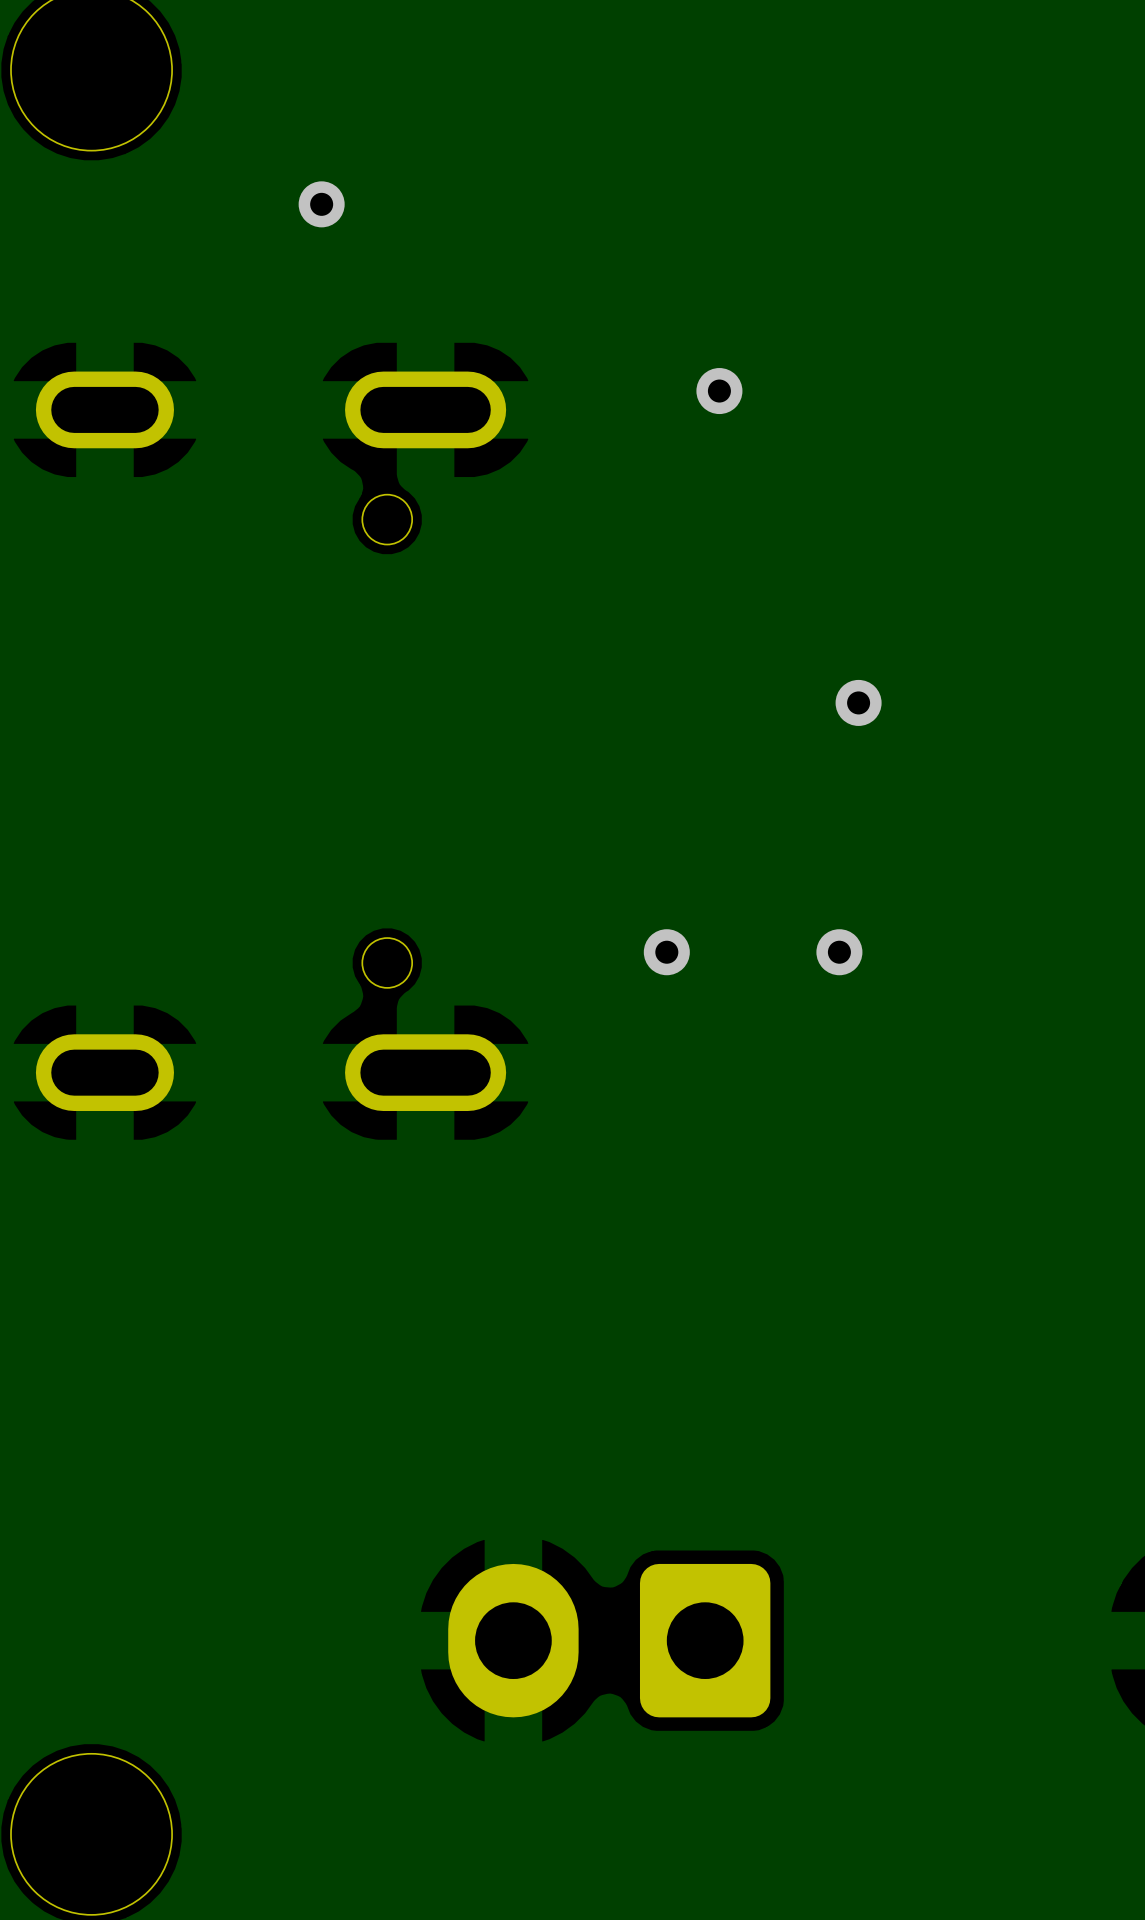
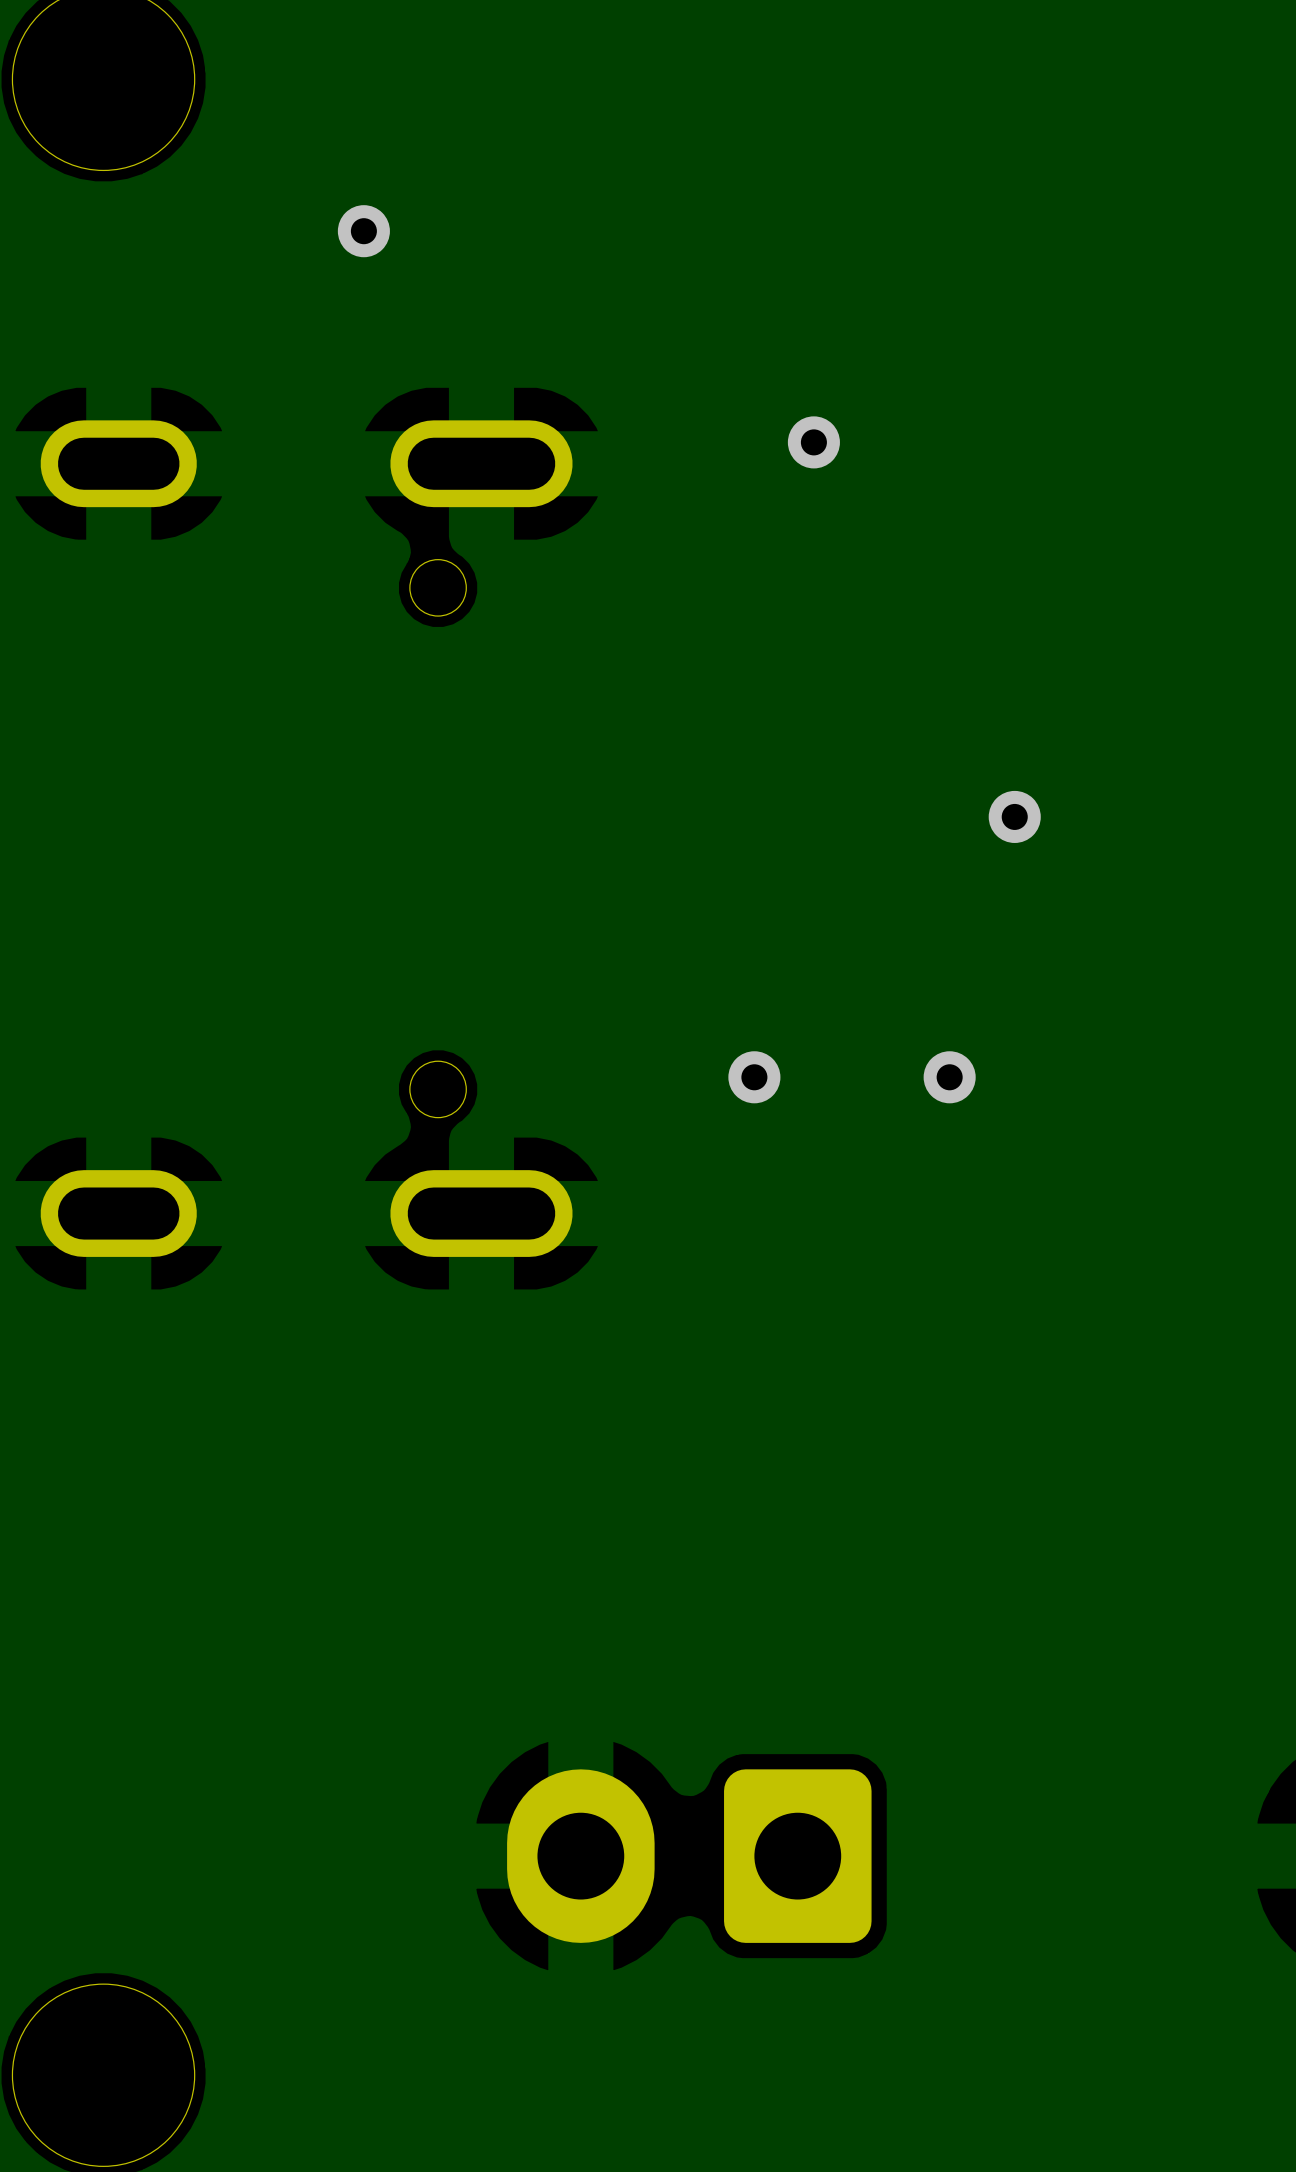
via position: (858, 702) -> (1014, 816)

